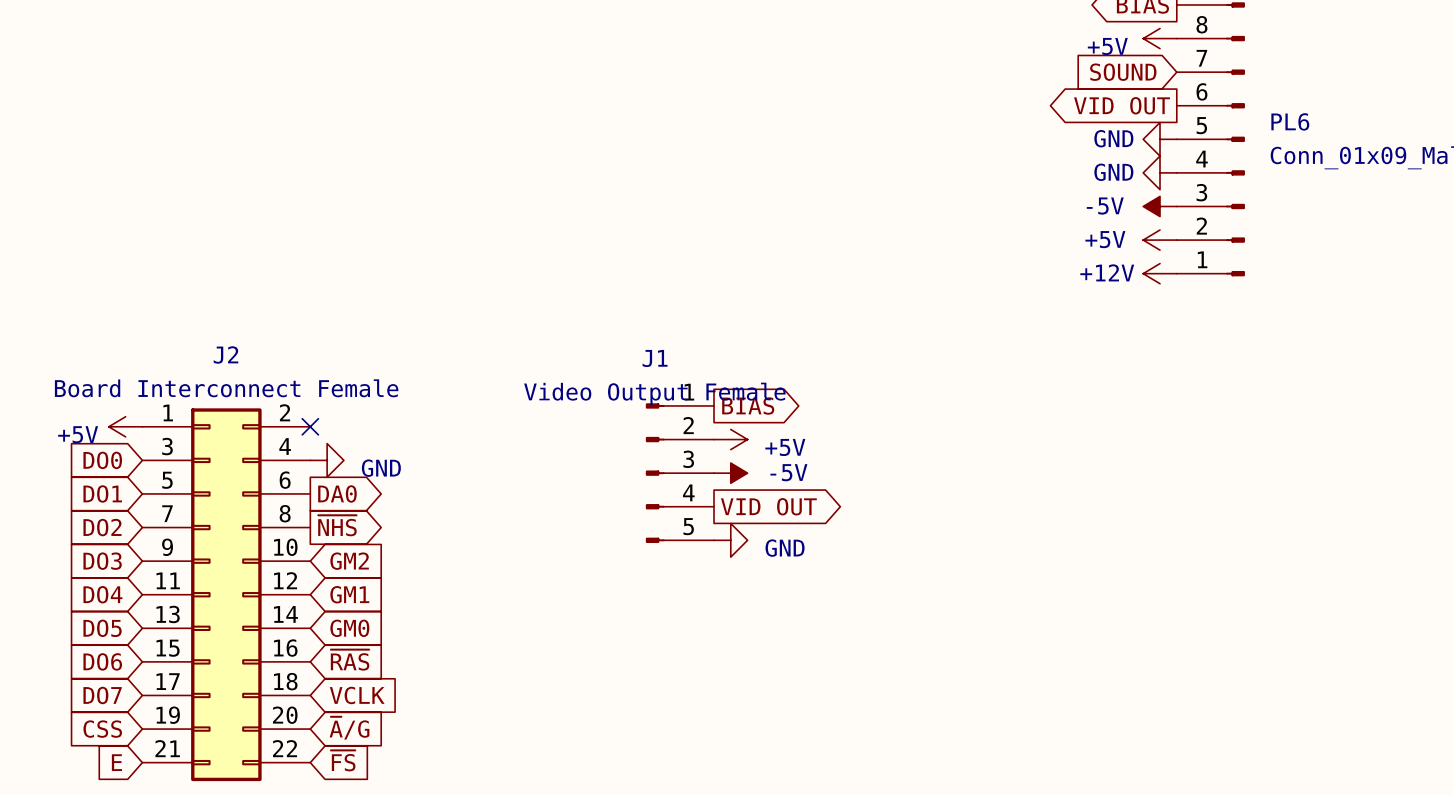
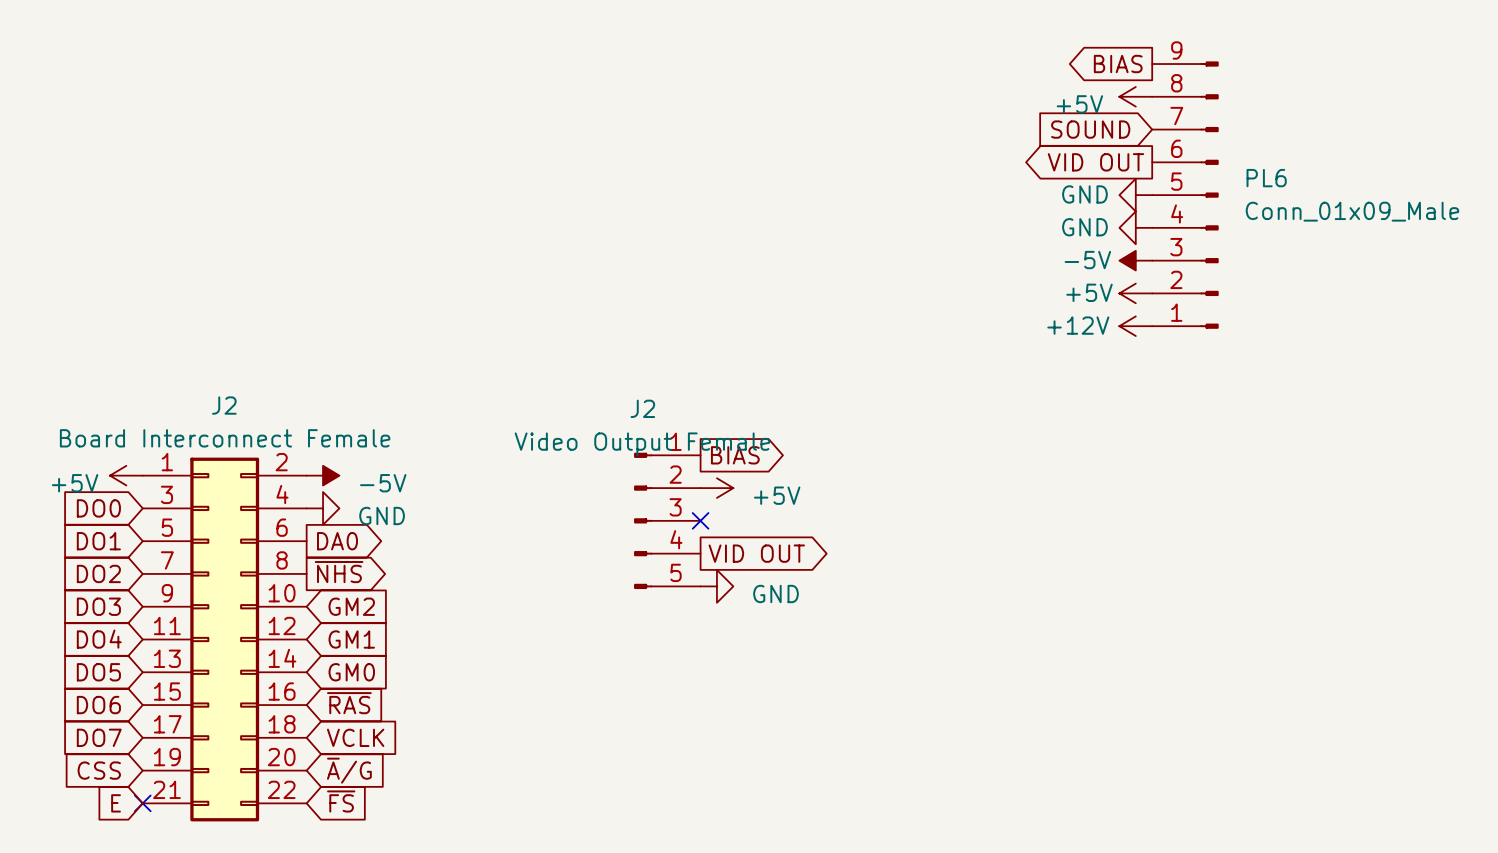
J1 name: J1 (655, 358) -> J2 (642, 408)
no-connect mark: (310, 426) -> none
power symbol: none -> -5V (323, 475)
no-connect mark: none -> (700, 520)
power symbol: -5V (730, 473) -> none
no-connect mark: none -> (142, 803)

